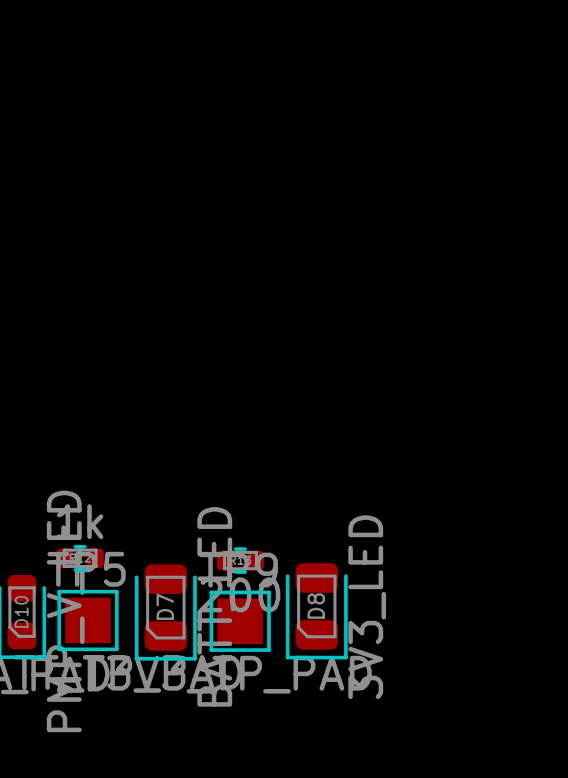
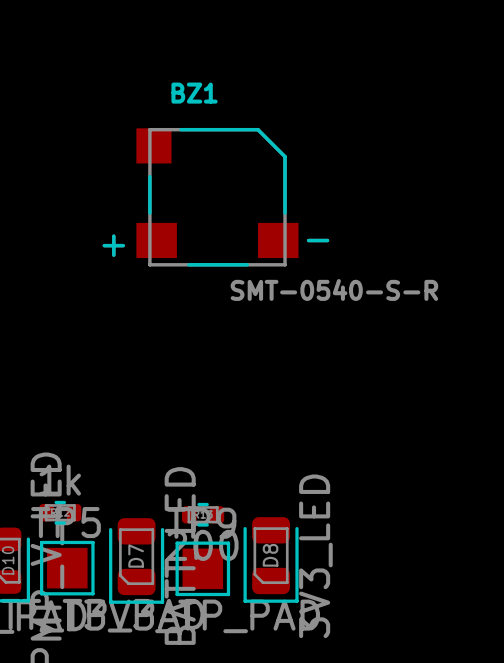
BZ1: none -> SMT-0540-S-R (215, 197)

